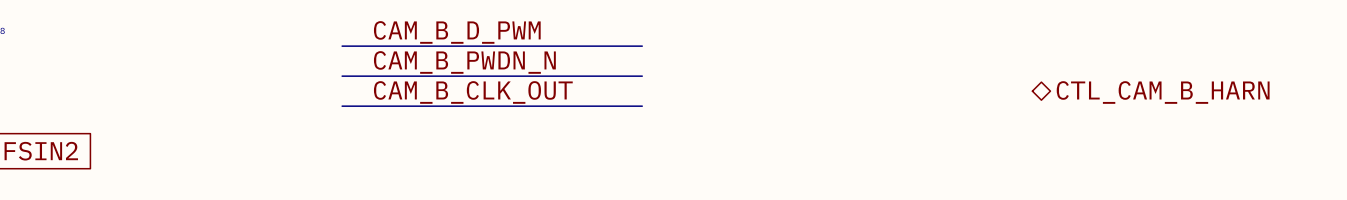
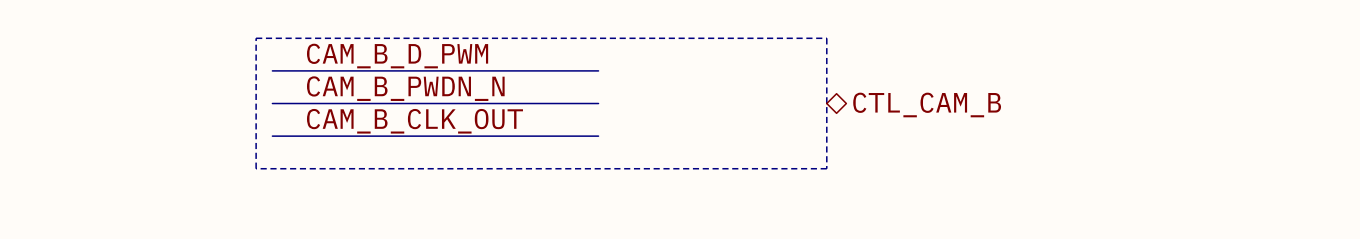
line: none -> (256, 38) (256, 168) (826, 168) (826, 38) (256, 38)
hierarchical label: none -> CTL_CAM_B (927, 104)
hierarchical label: CTL_CAM_B_HARN (1163, 92) -> none

